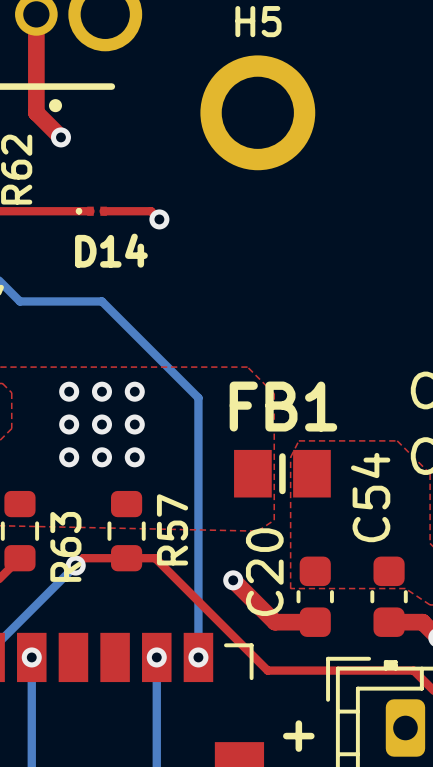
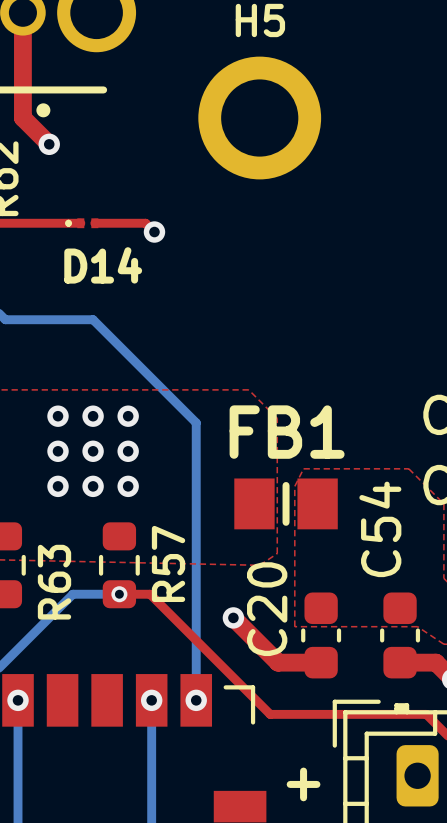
top track: (126, 558) (83, 558) (75, 565) -> none
bottom track: none -> (119, 594) (72, 594) (65, 602)
via: none -> (119, 594)
via: (75, 565) -> none

